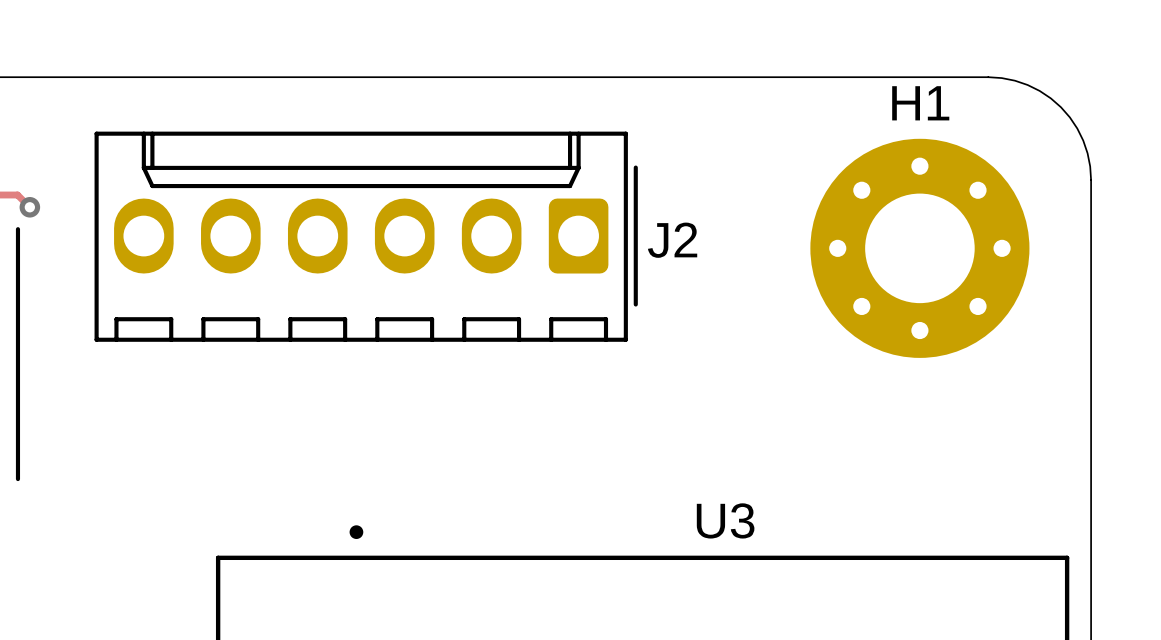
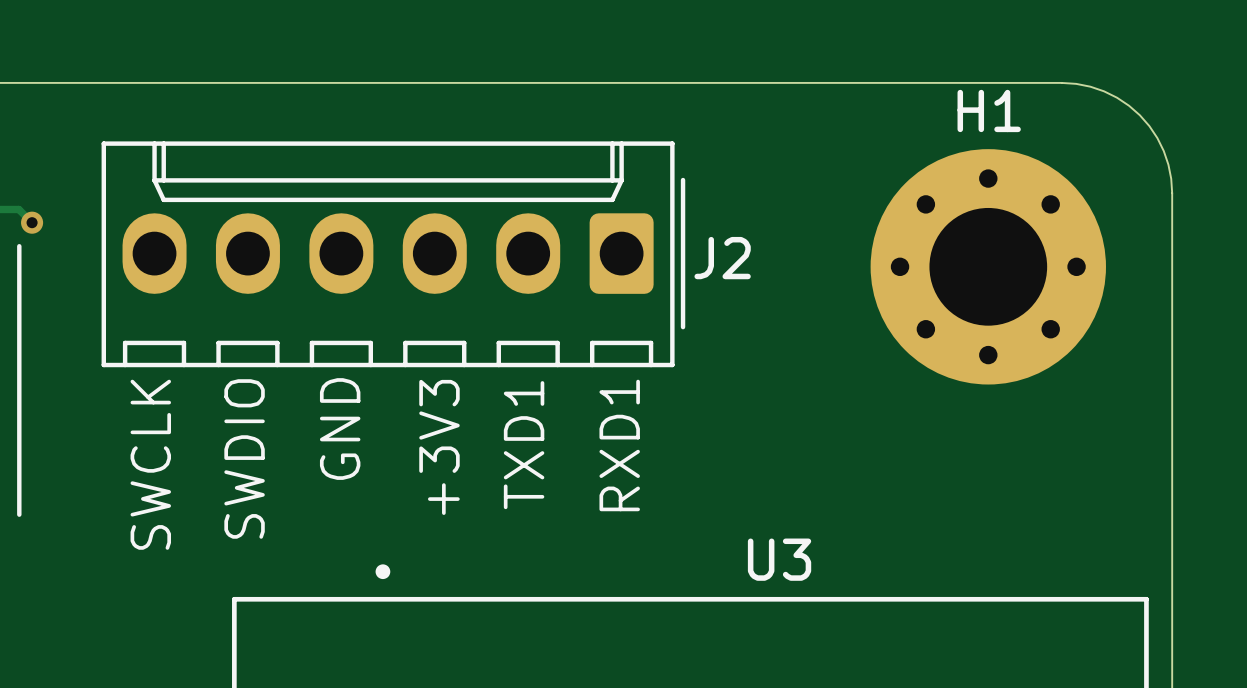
text: none -> GND (340, 429)
text: none -> TXD1 (524, 445)
text: none -> RXD1 (619, 445)
text: none -> SWDIO (244, 458)
text: none -> SWCLK (150, 464)
text: none -> +3V3 (439, 447)

